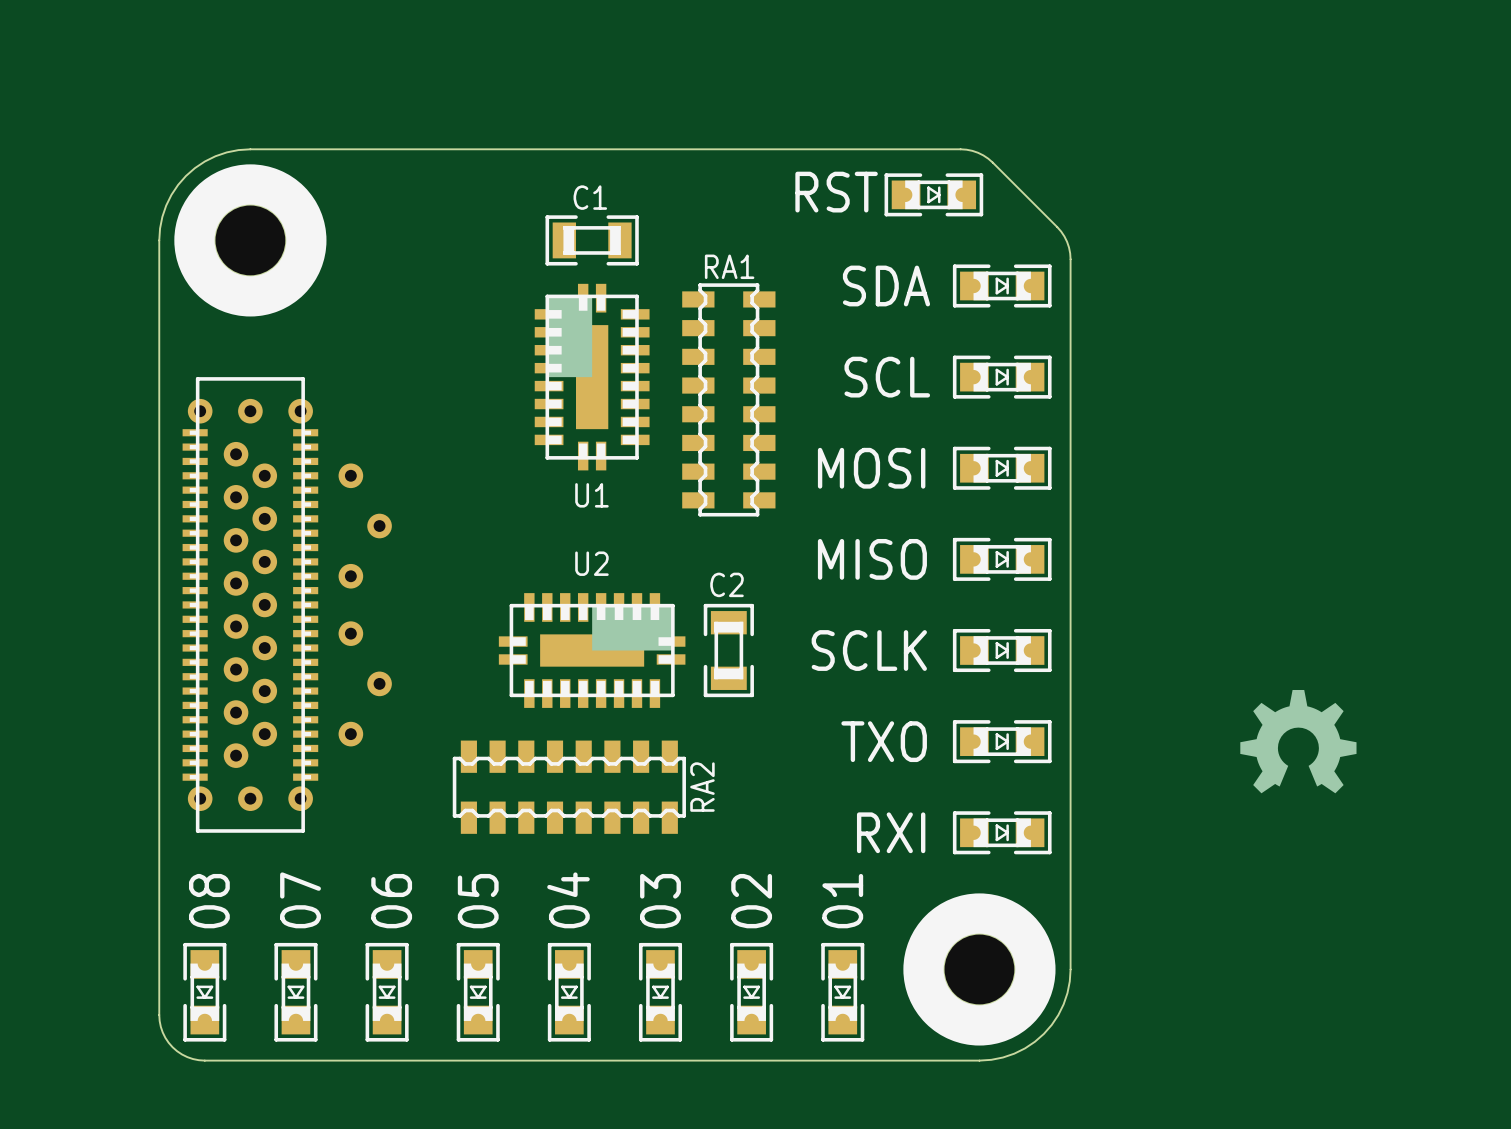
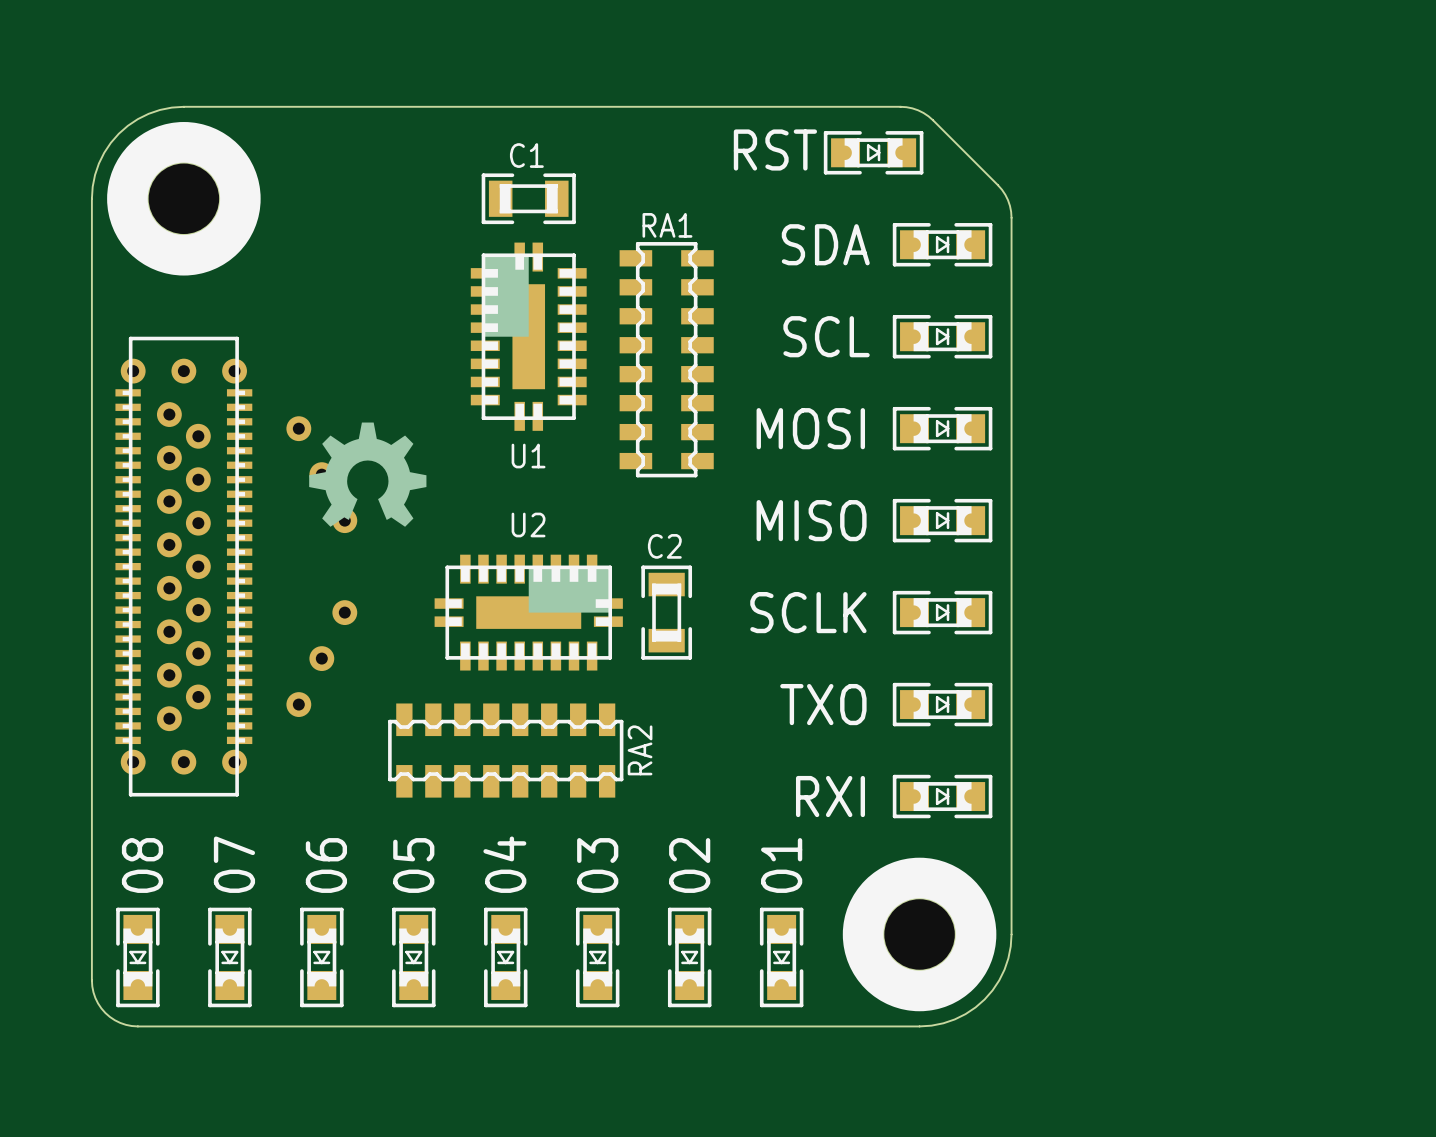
part footprint: [182, 377, 392, 833] -> [115, 336, 358, 797]
drawing: none -> [309, 422, 427, 527]
drawing: [1240, 689, 1357, 794] -> none

